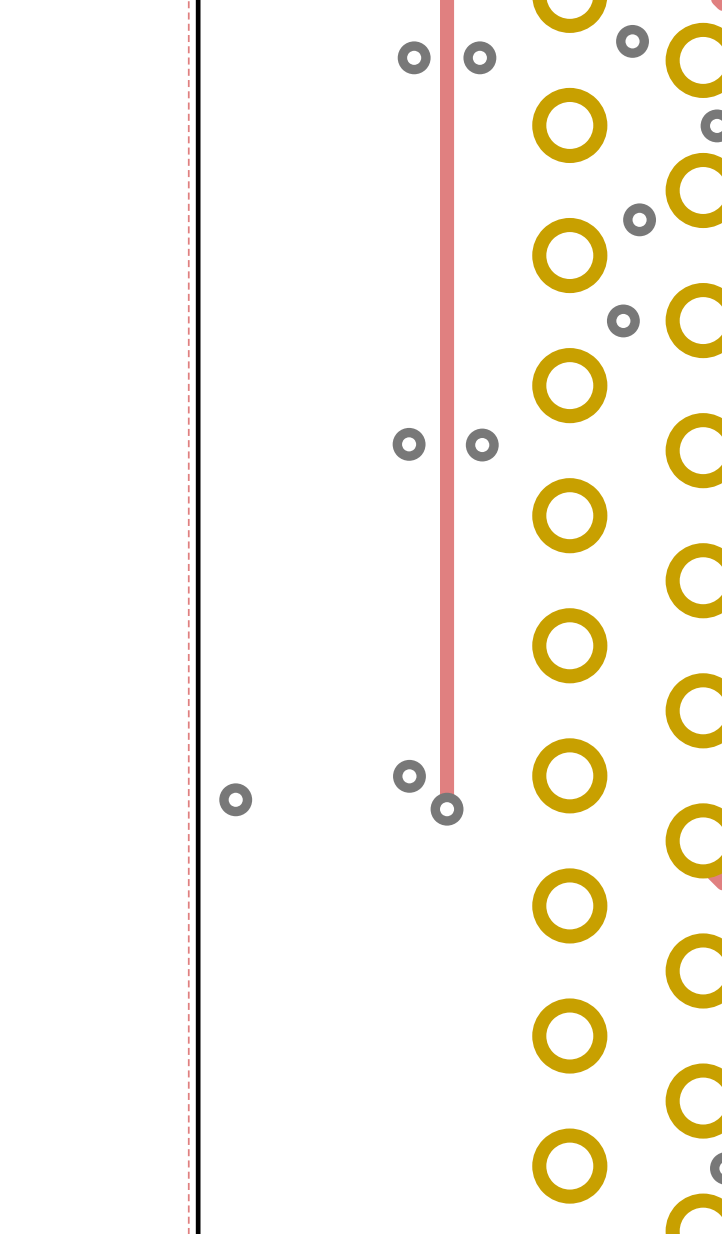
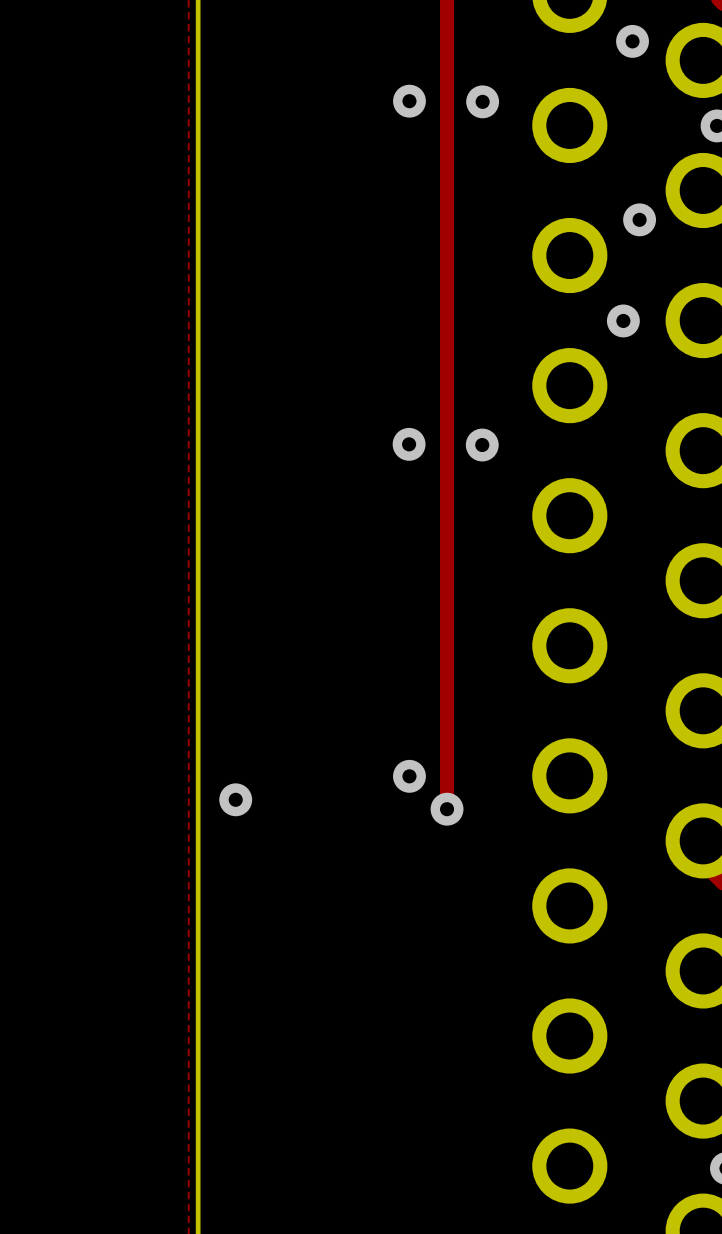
via: (414, 57) -> none
via: (479, 57) -> none
via: none -> (409, 101)
via: none -> (482, 101)

